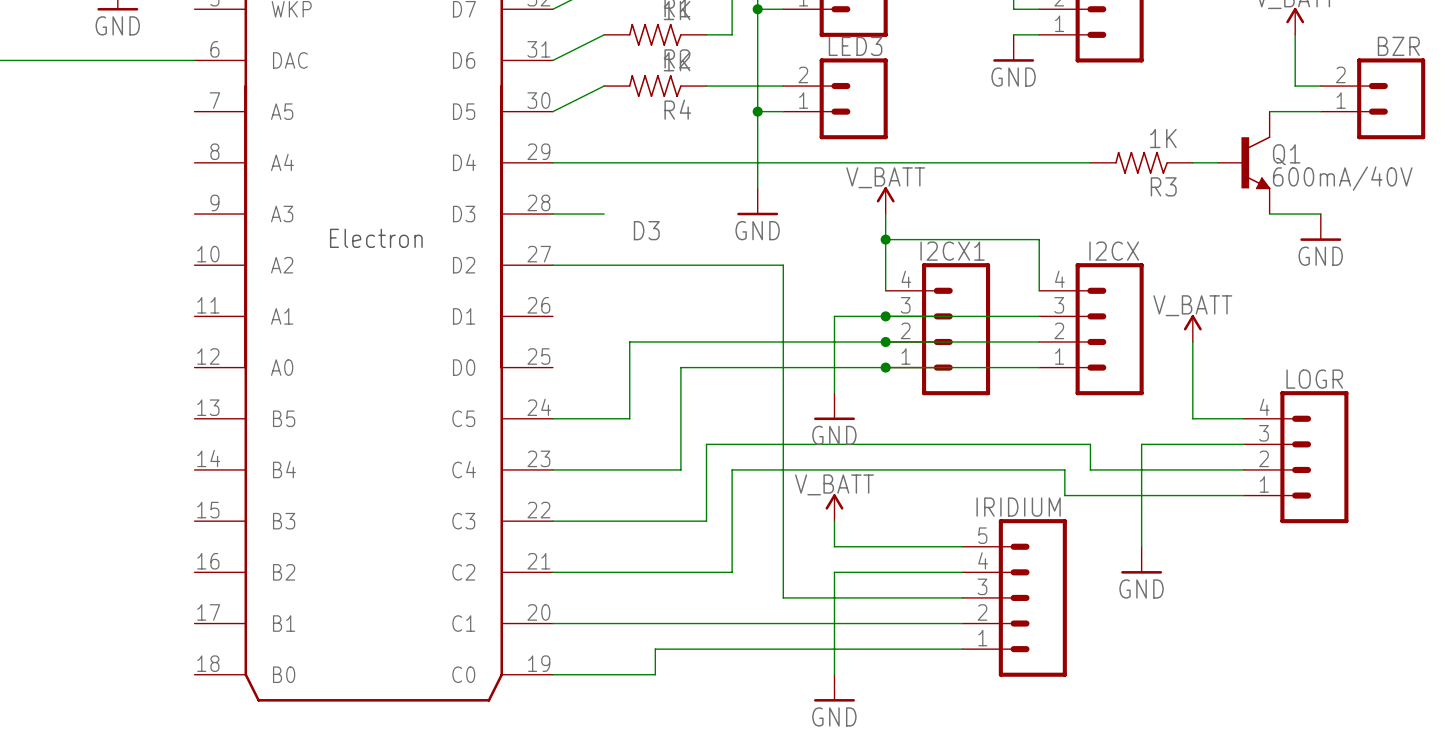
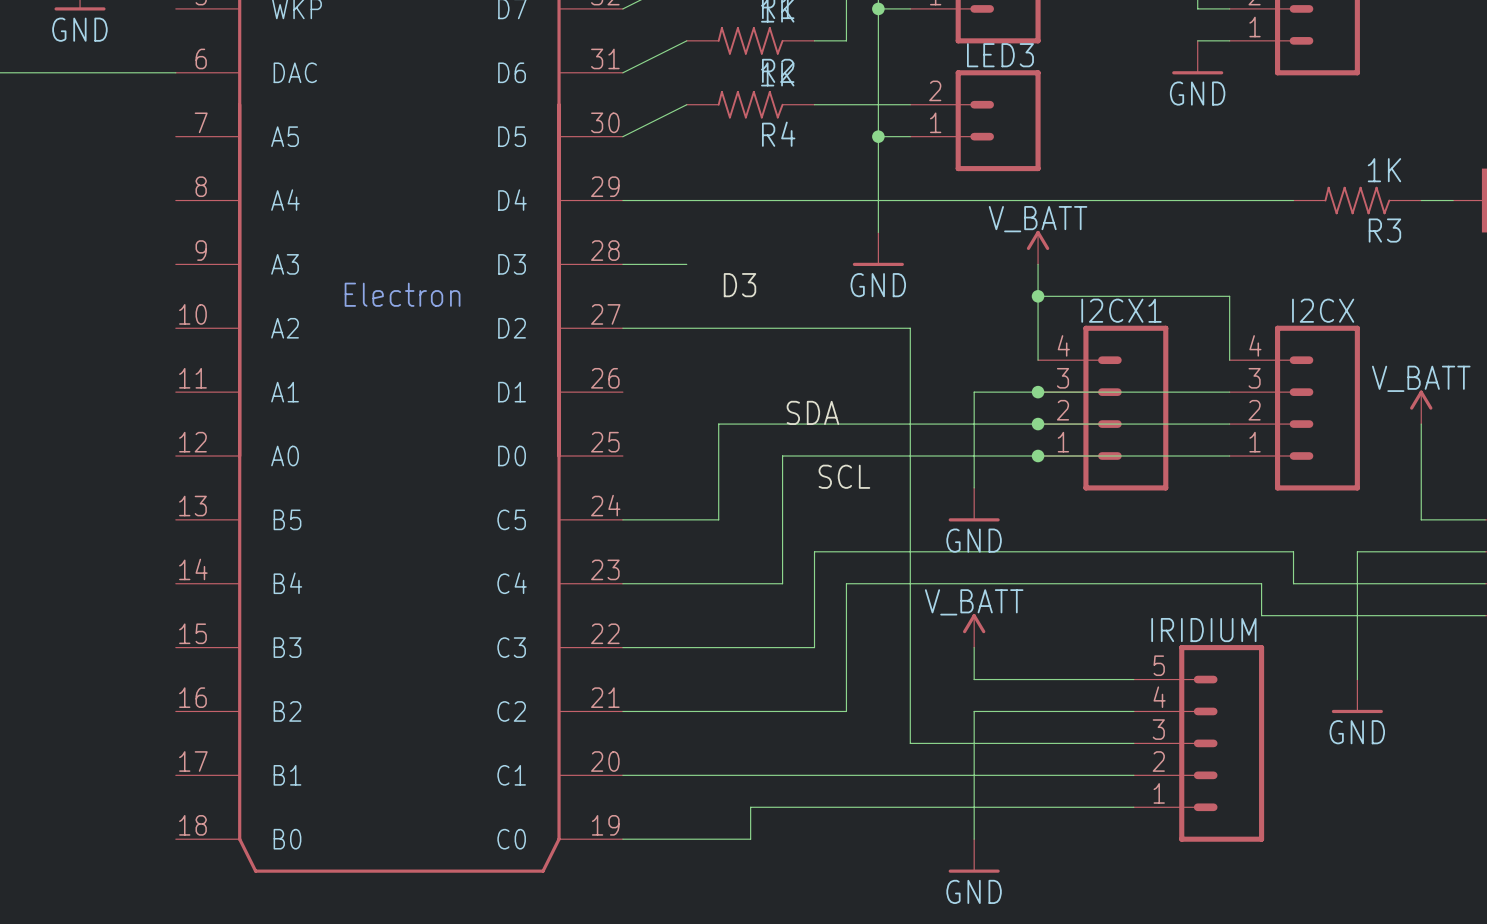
label: none -> SDA (812, 412)
label: none -> SCL (844, 476)

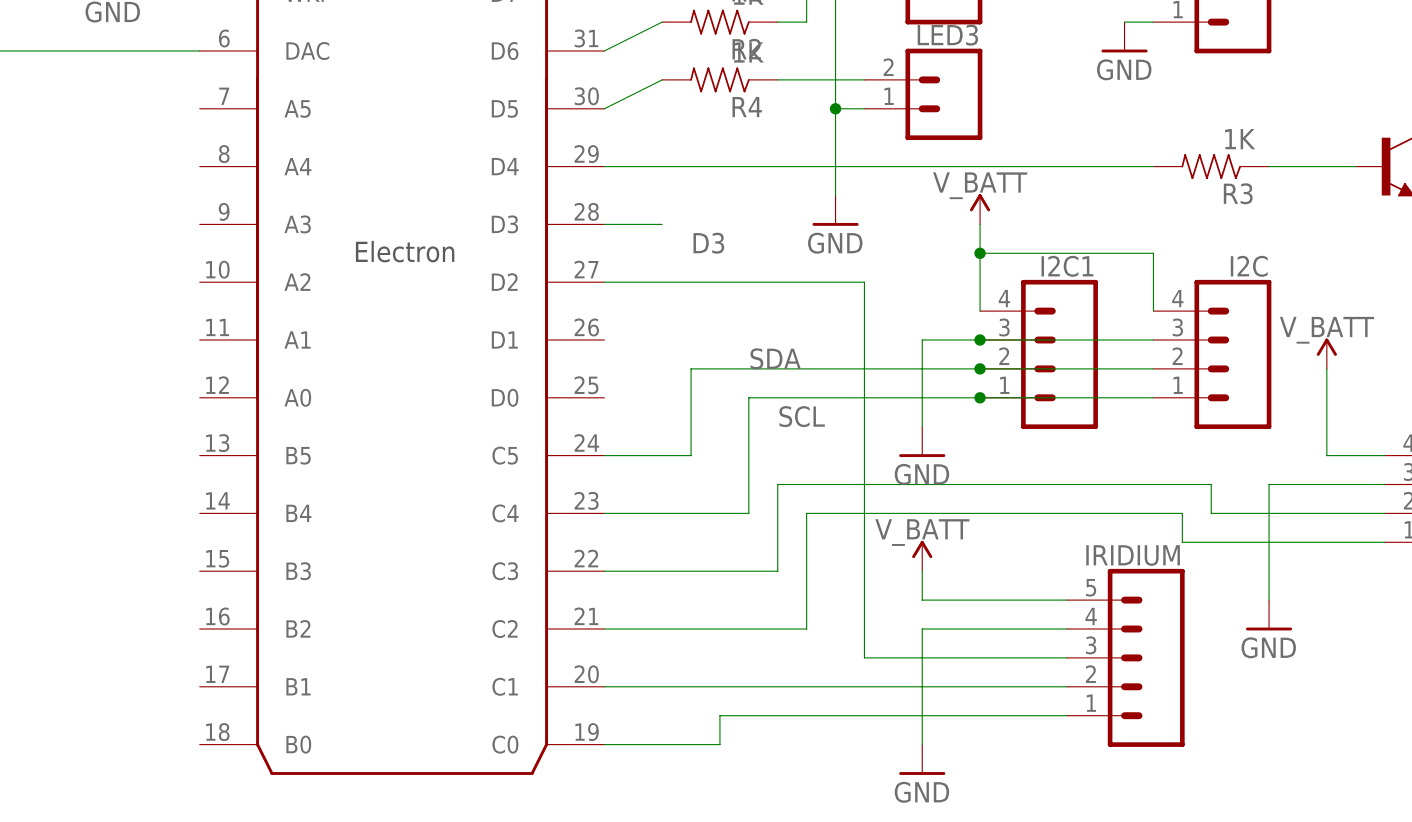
R3 position: (1357, 200) -> (1211, 166)
I2CX1 name: I2CX1 (1121, 310) -> I2C1 (1067, 266)
I2CX name: I2CX (1323, 310) -> I2C (1249, 266)

